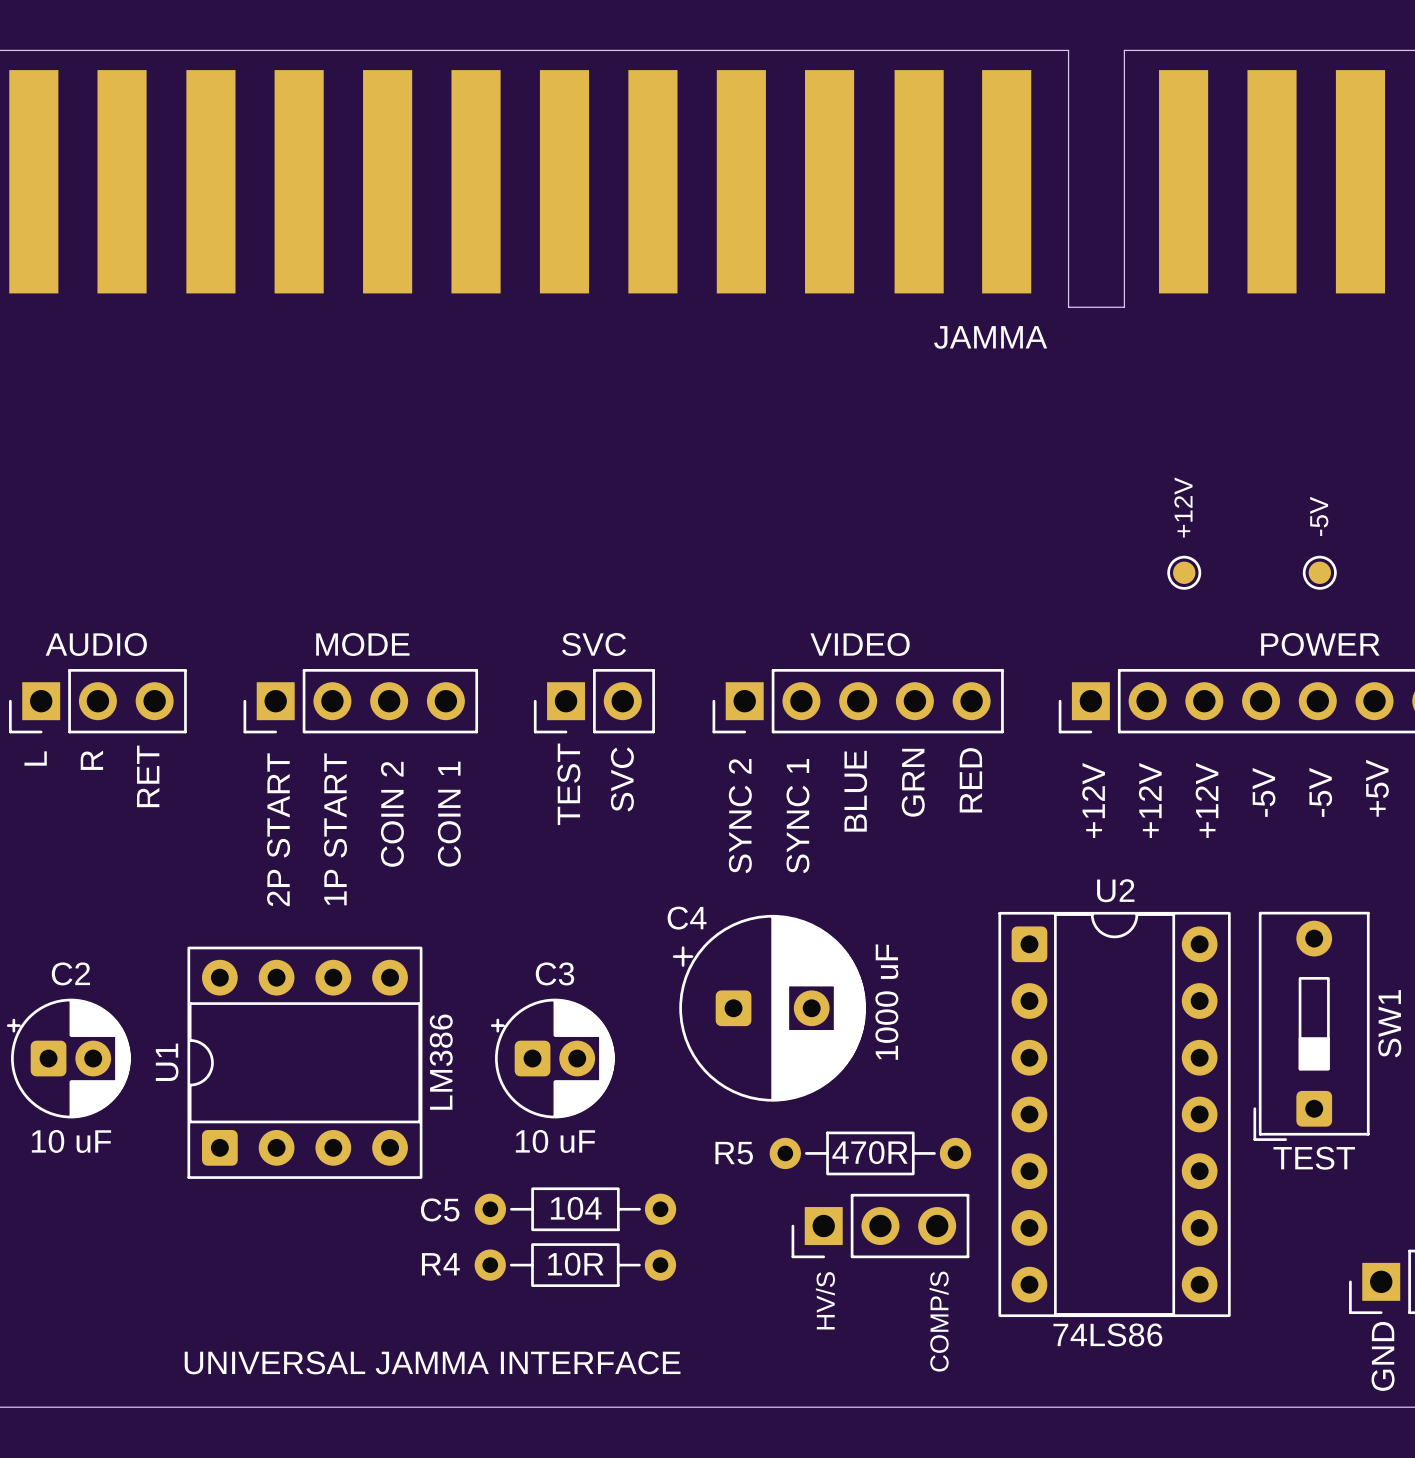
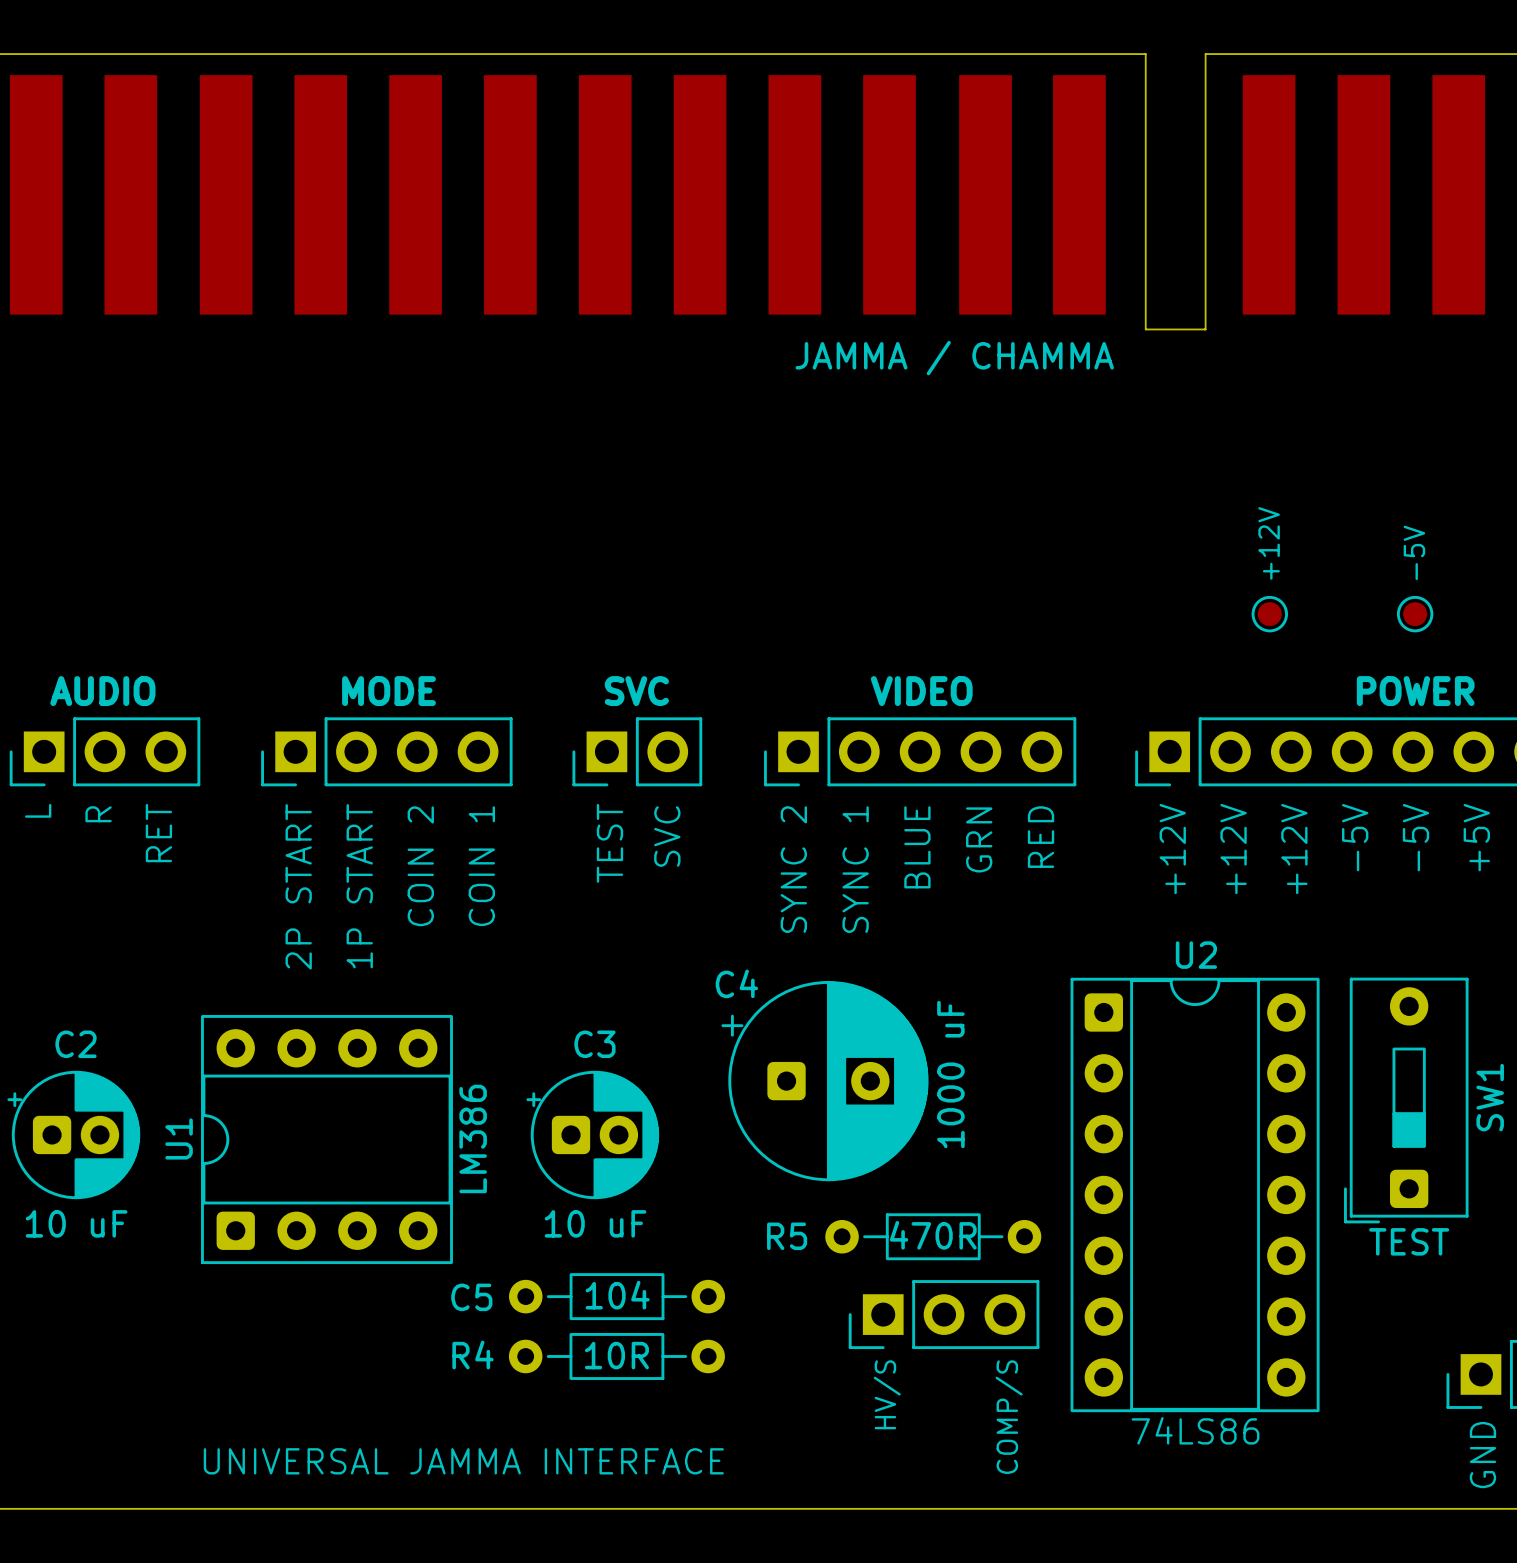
JAMMA name: JAMMA (990, 337) -> JAMMA / CHAMMA (954, 358)

